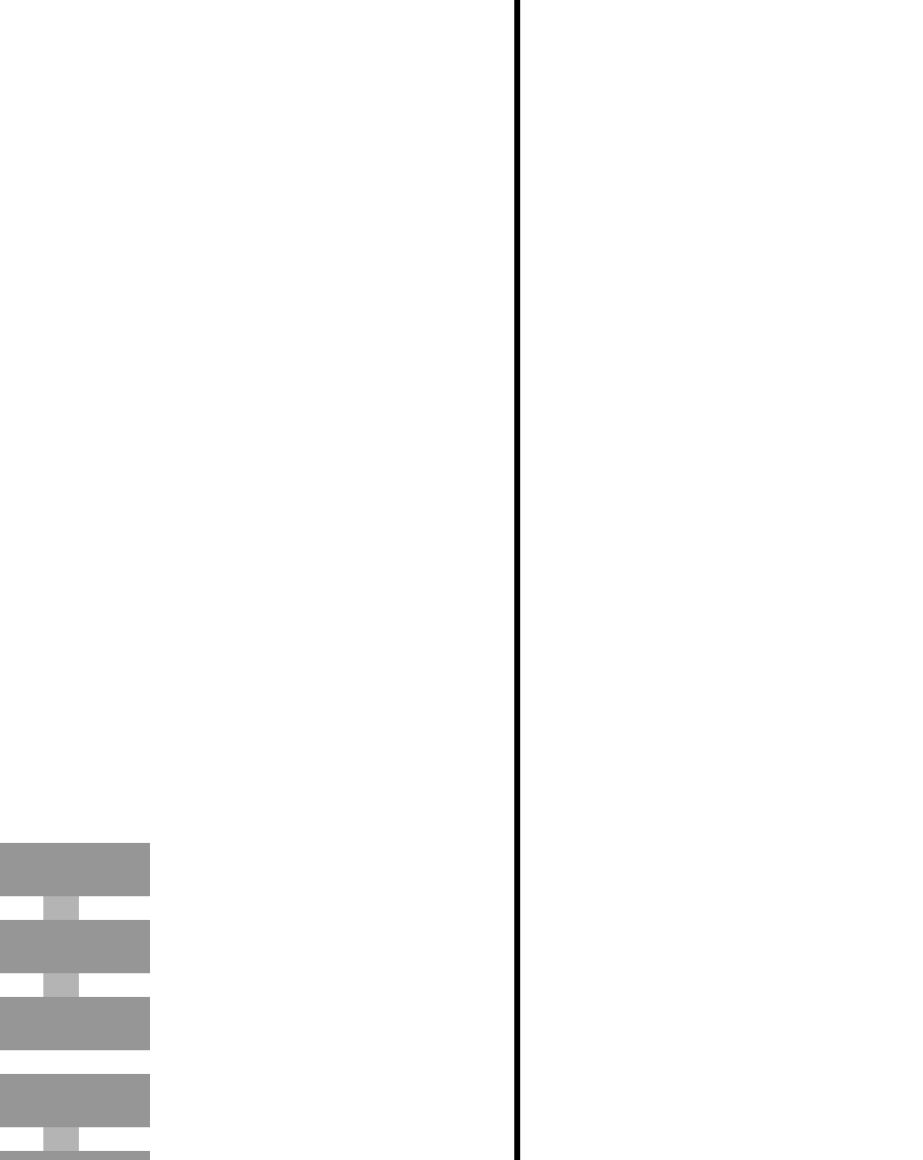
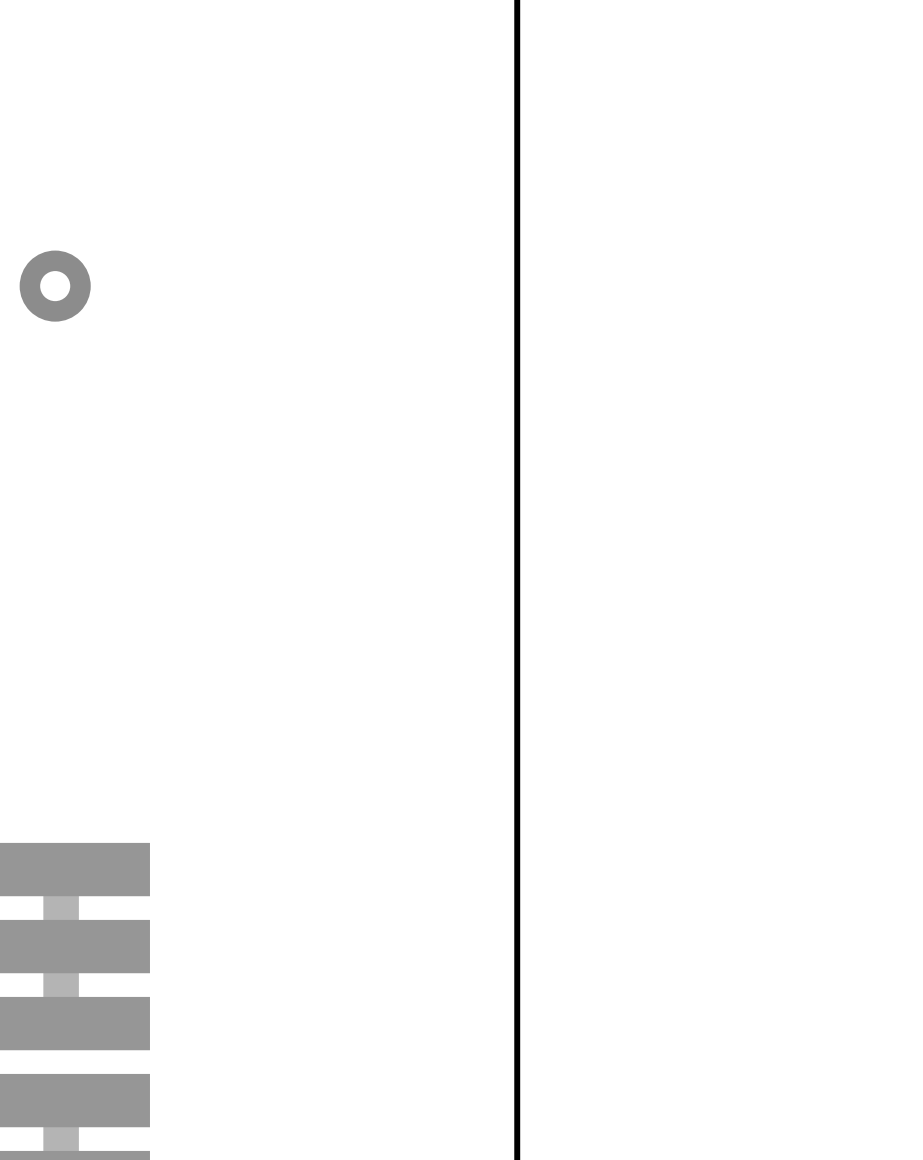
via: none -> (55, 286)

